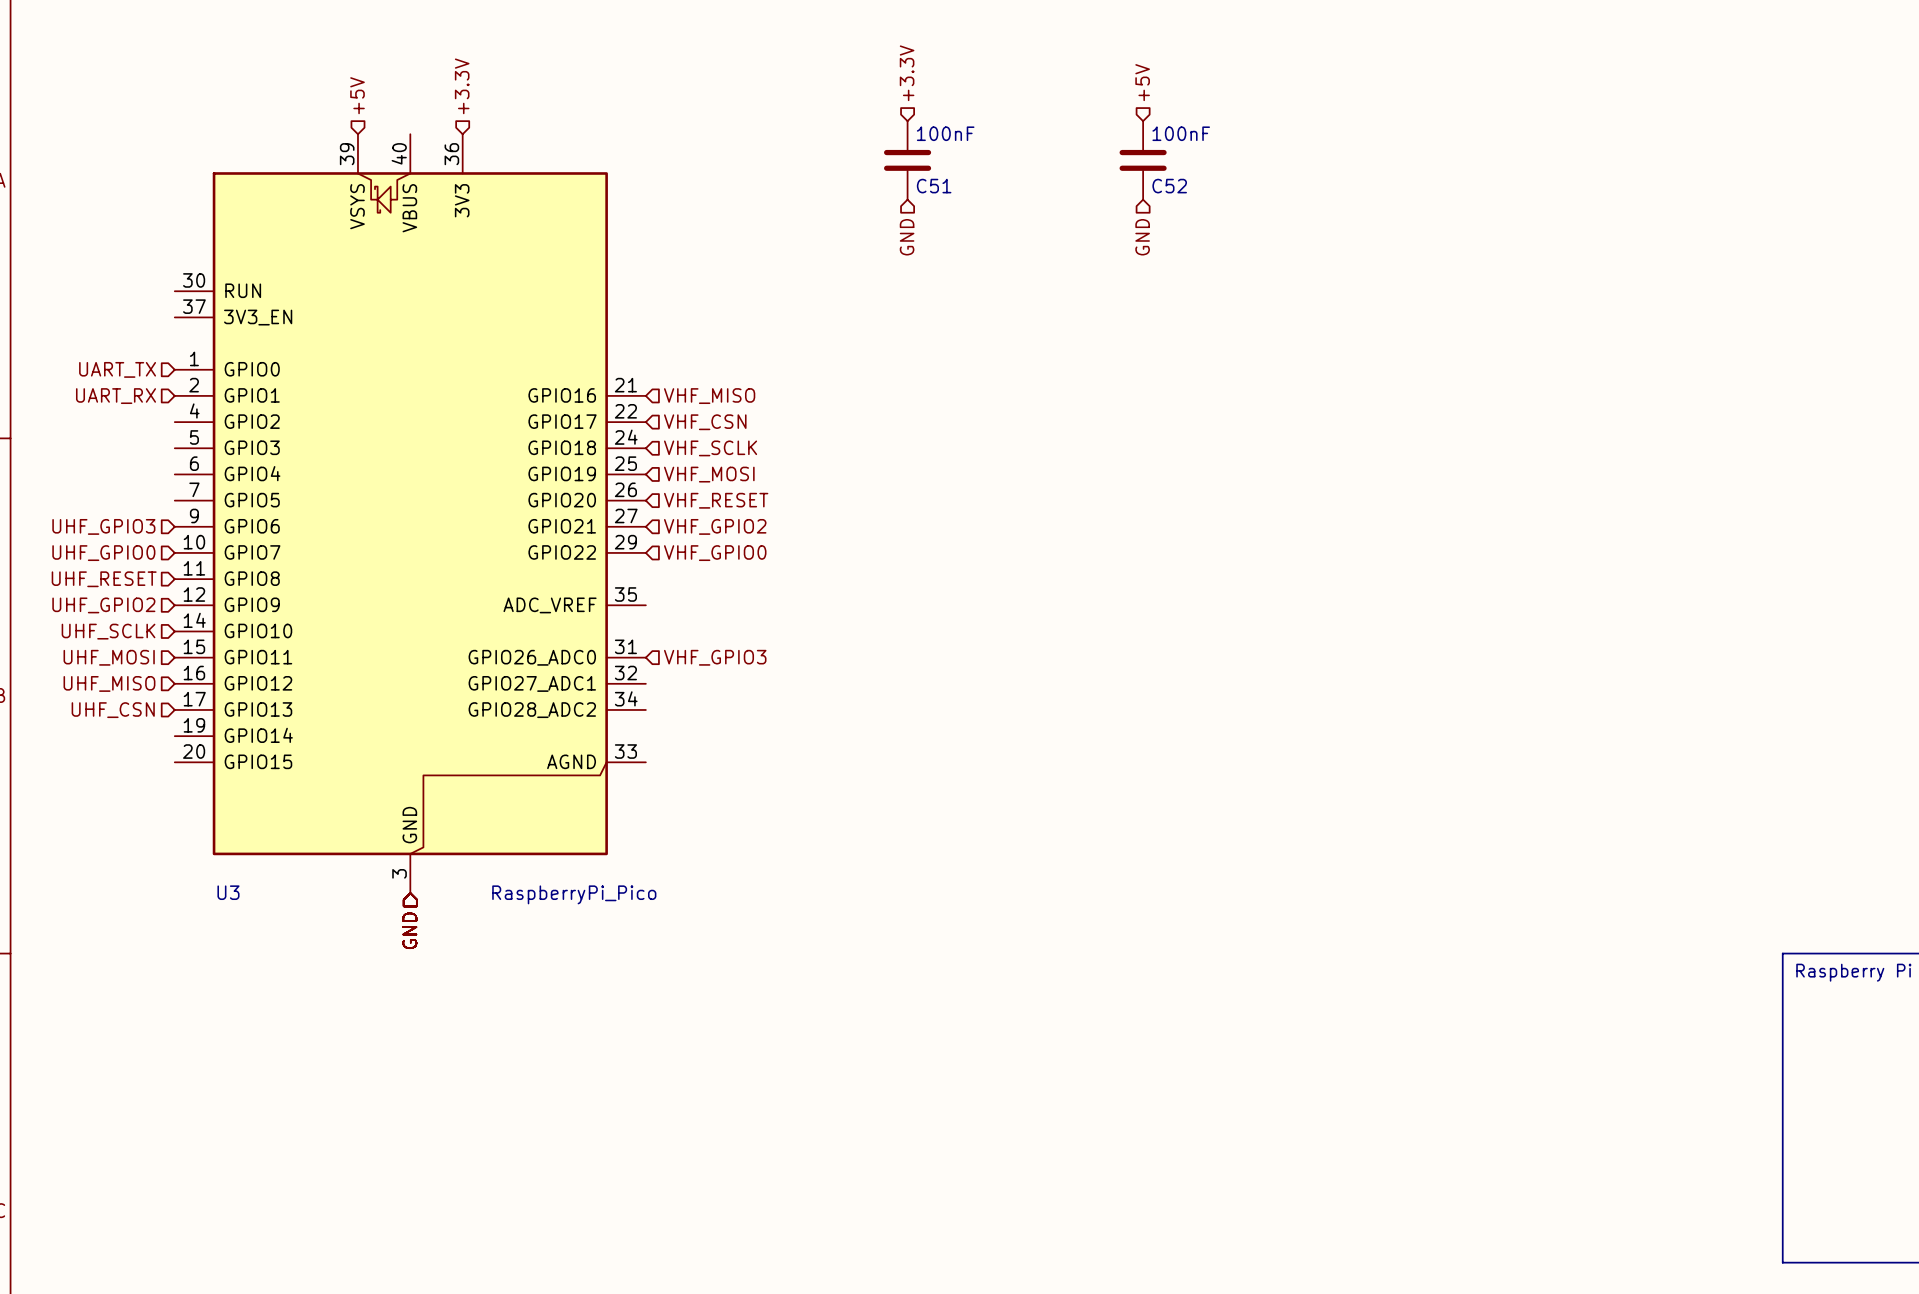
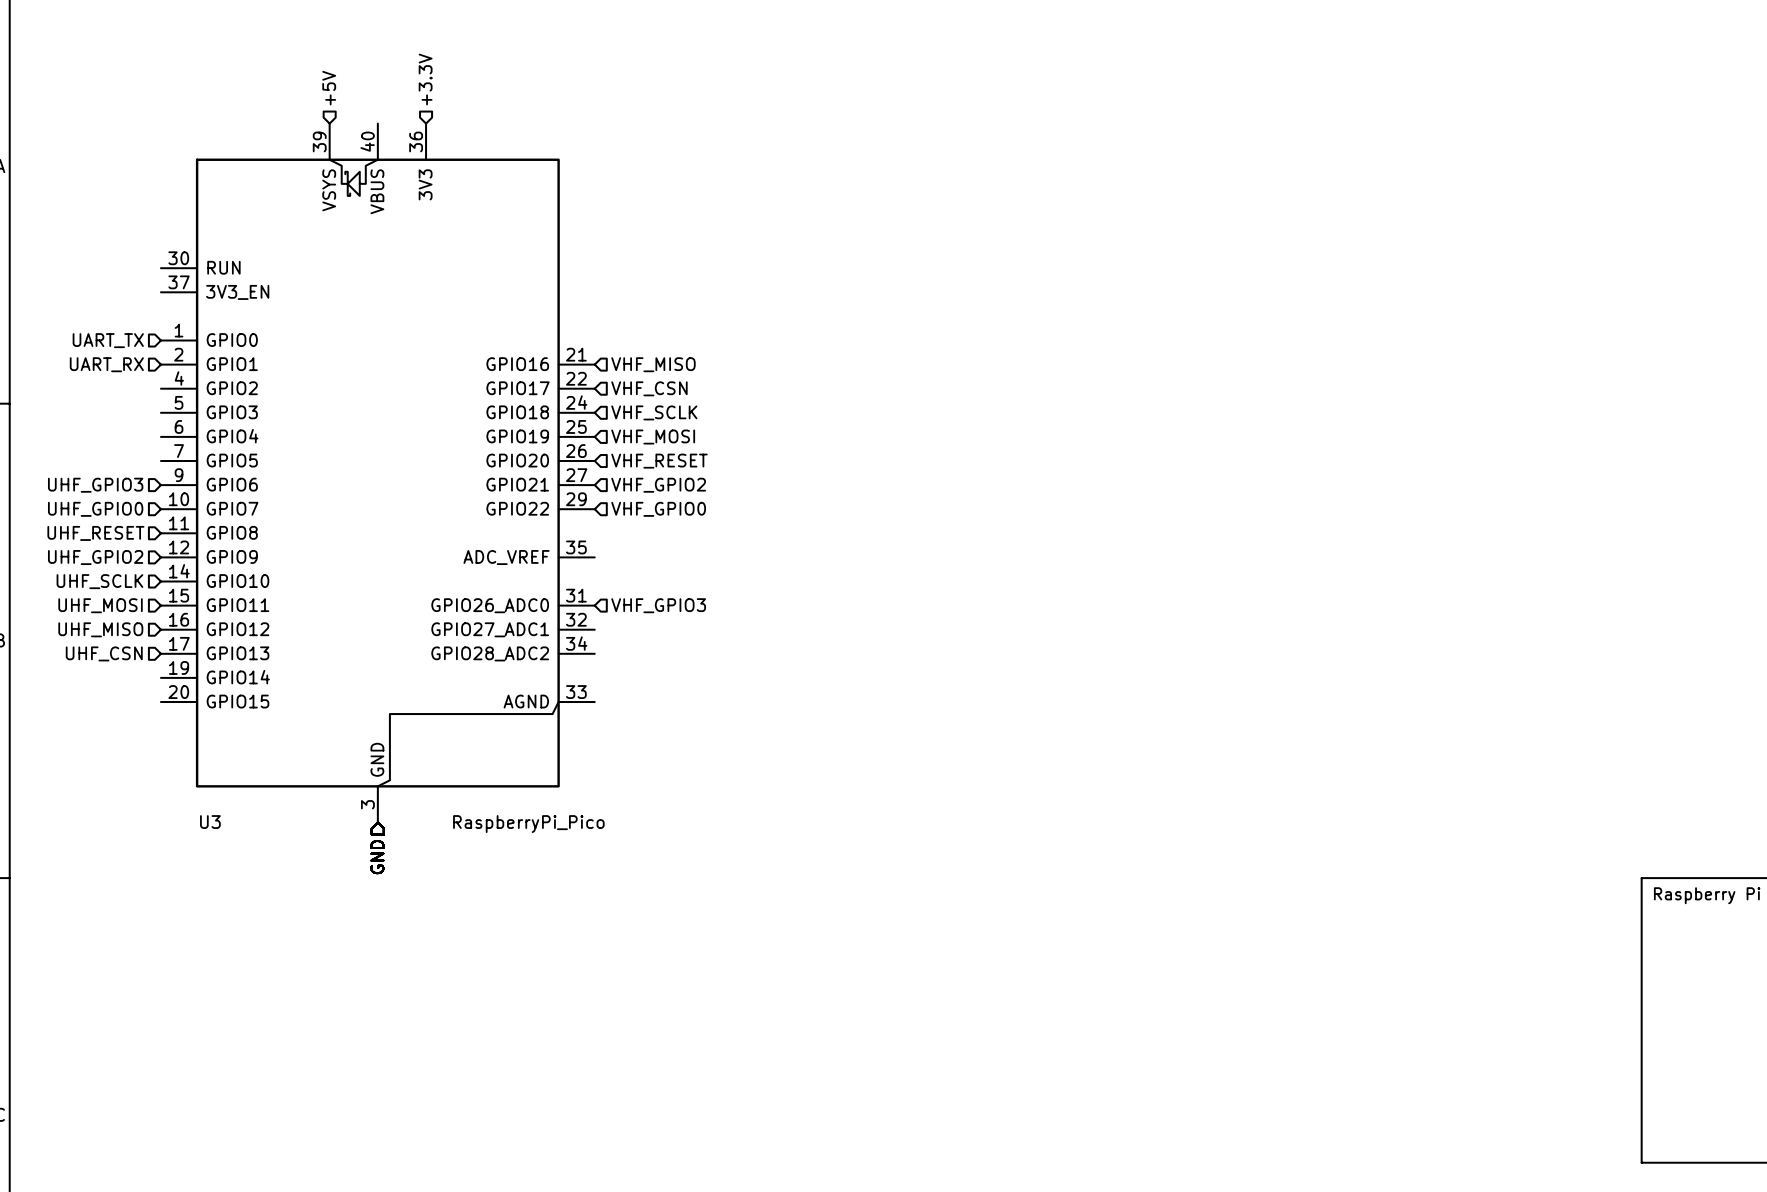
hierarchical label: +3.3V (907, 73) -> none
hierarchical label: +5V (1142, 82) -> none
C51: 100nF (907, 160) -> none
C52: 100nF (1143, 160) -> none
hierarchical label: GND (907, 237) -> none
hierarchical label: GND (1142, 237) -> none

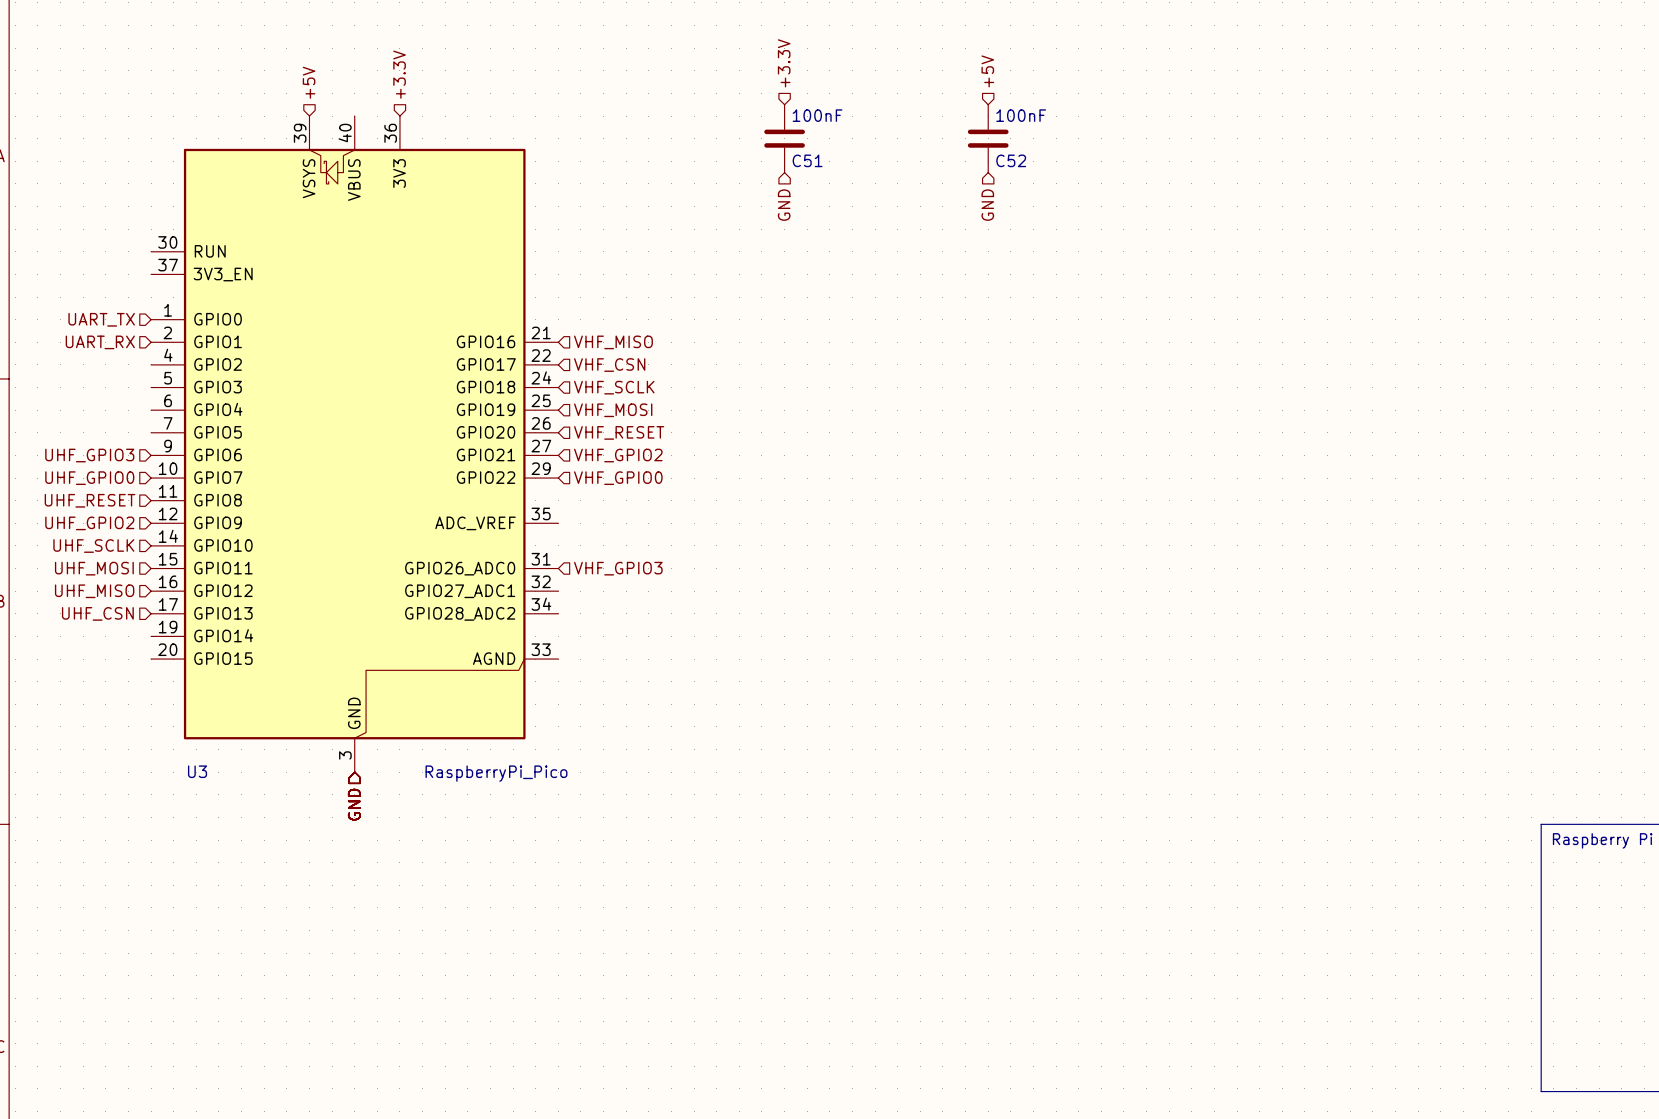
hierarchical label: none -> +3.3V (784, 63)
hierarchical label: none -> +5V (987, 71)
C51: none -> 100nF (784, 138)
C52: none -> 100nF (988, 138)
hierarchical label: none -> GND (784, 205)
hierarchical label: none -> GND (987, 205)

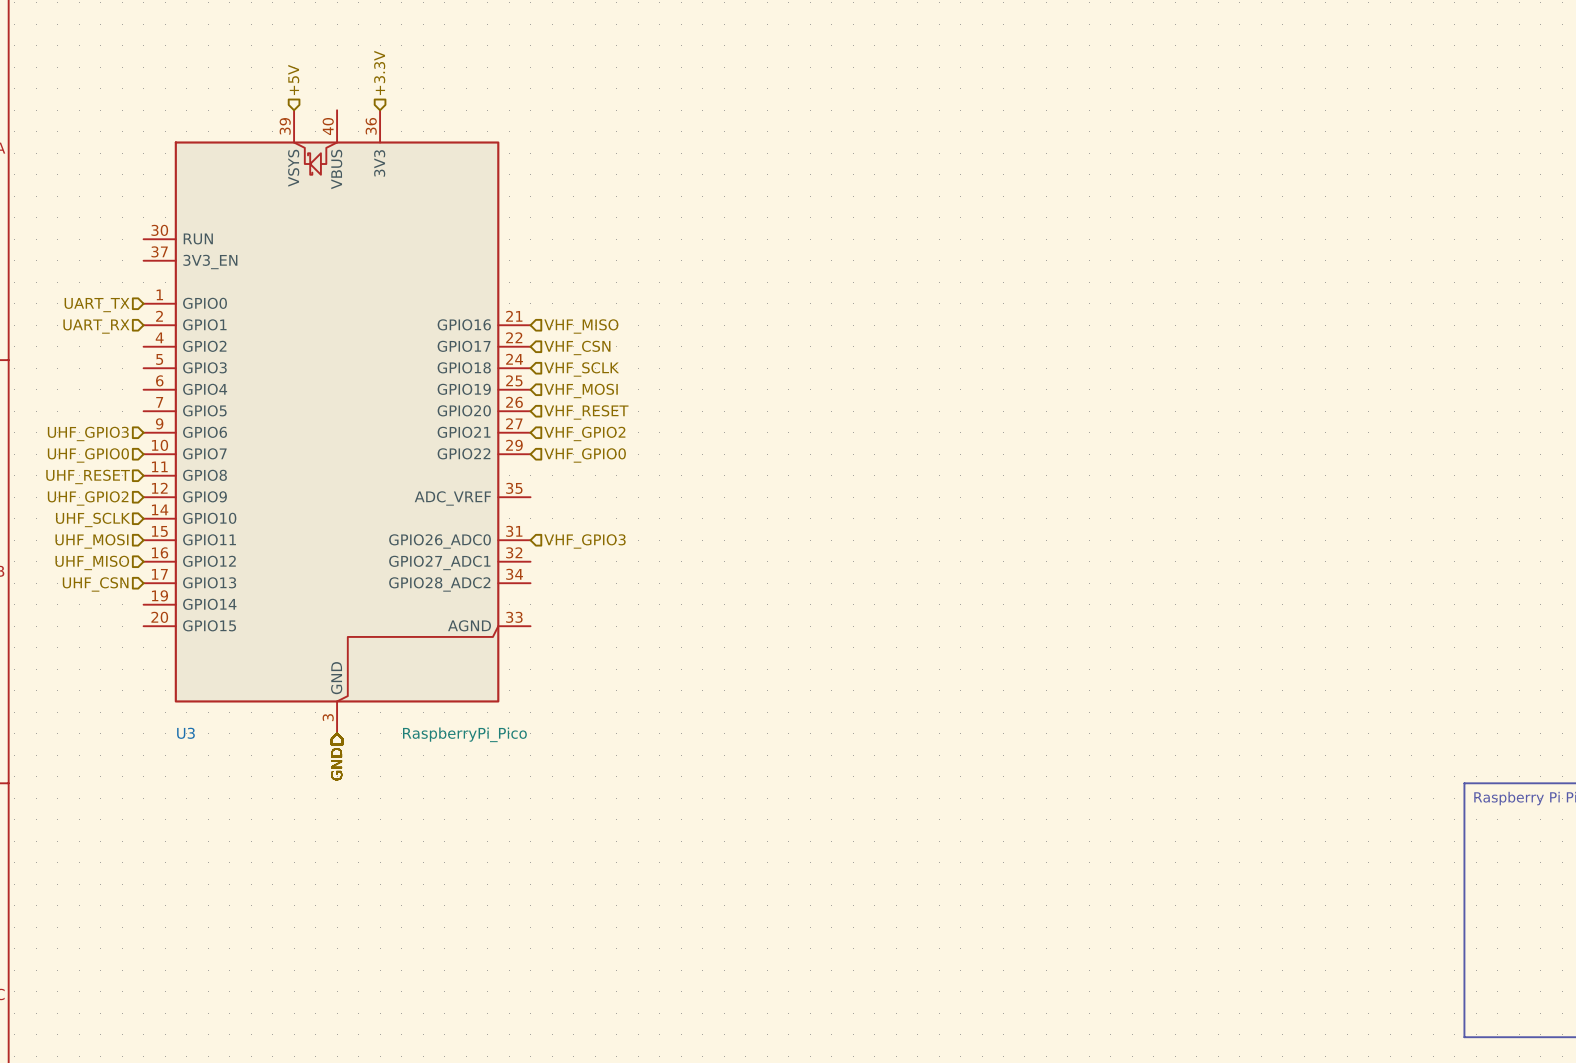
hierarchical label: +3.3V (784, 63) -> none
hierarchical label: +5V (987, 71) -> none
C51: 100nF (784, 138) -> none
C52: 100nF (988, 138) -> none
hierarchical label: GND (784, 205) -> none
hierarchical label: GND (987, 205) -> none

